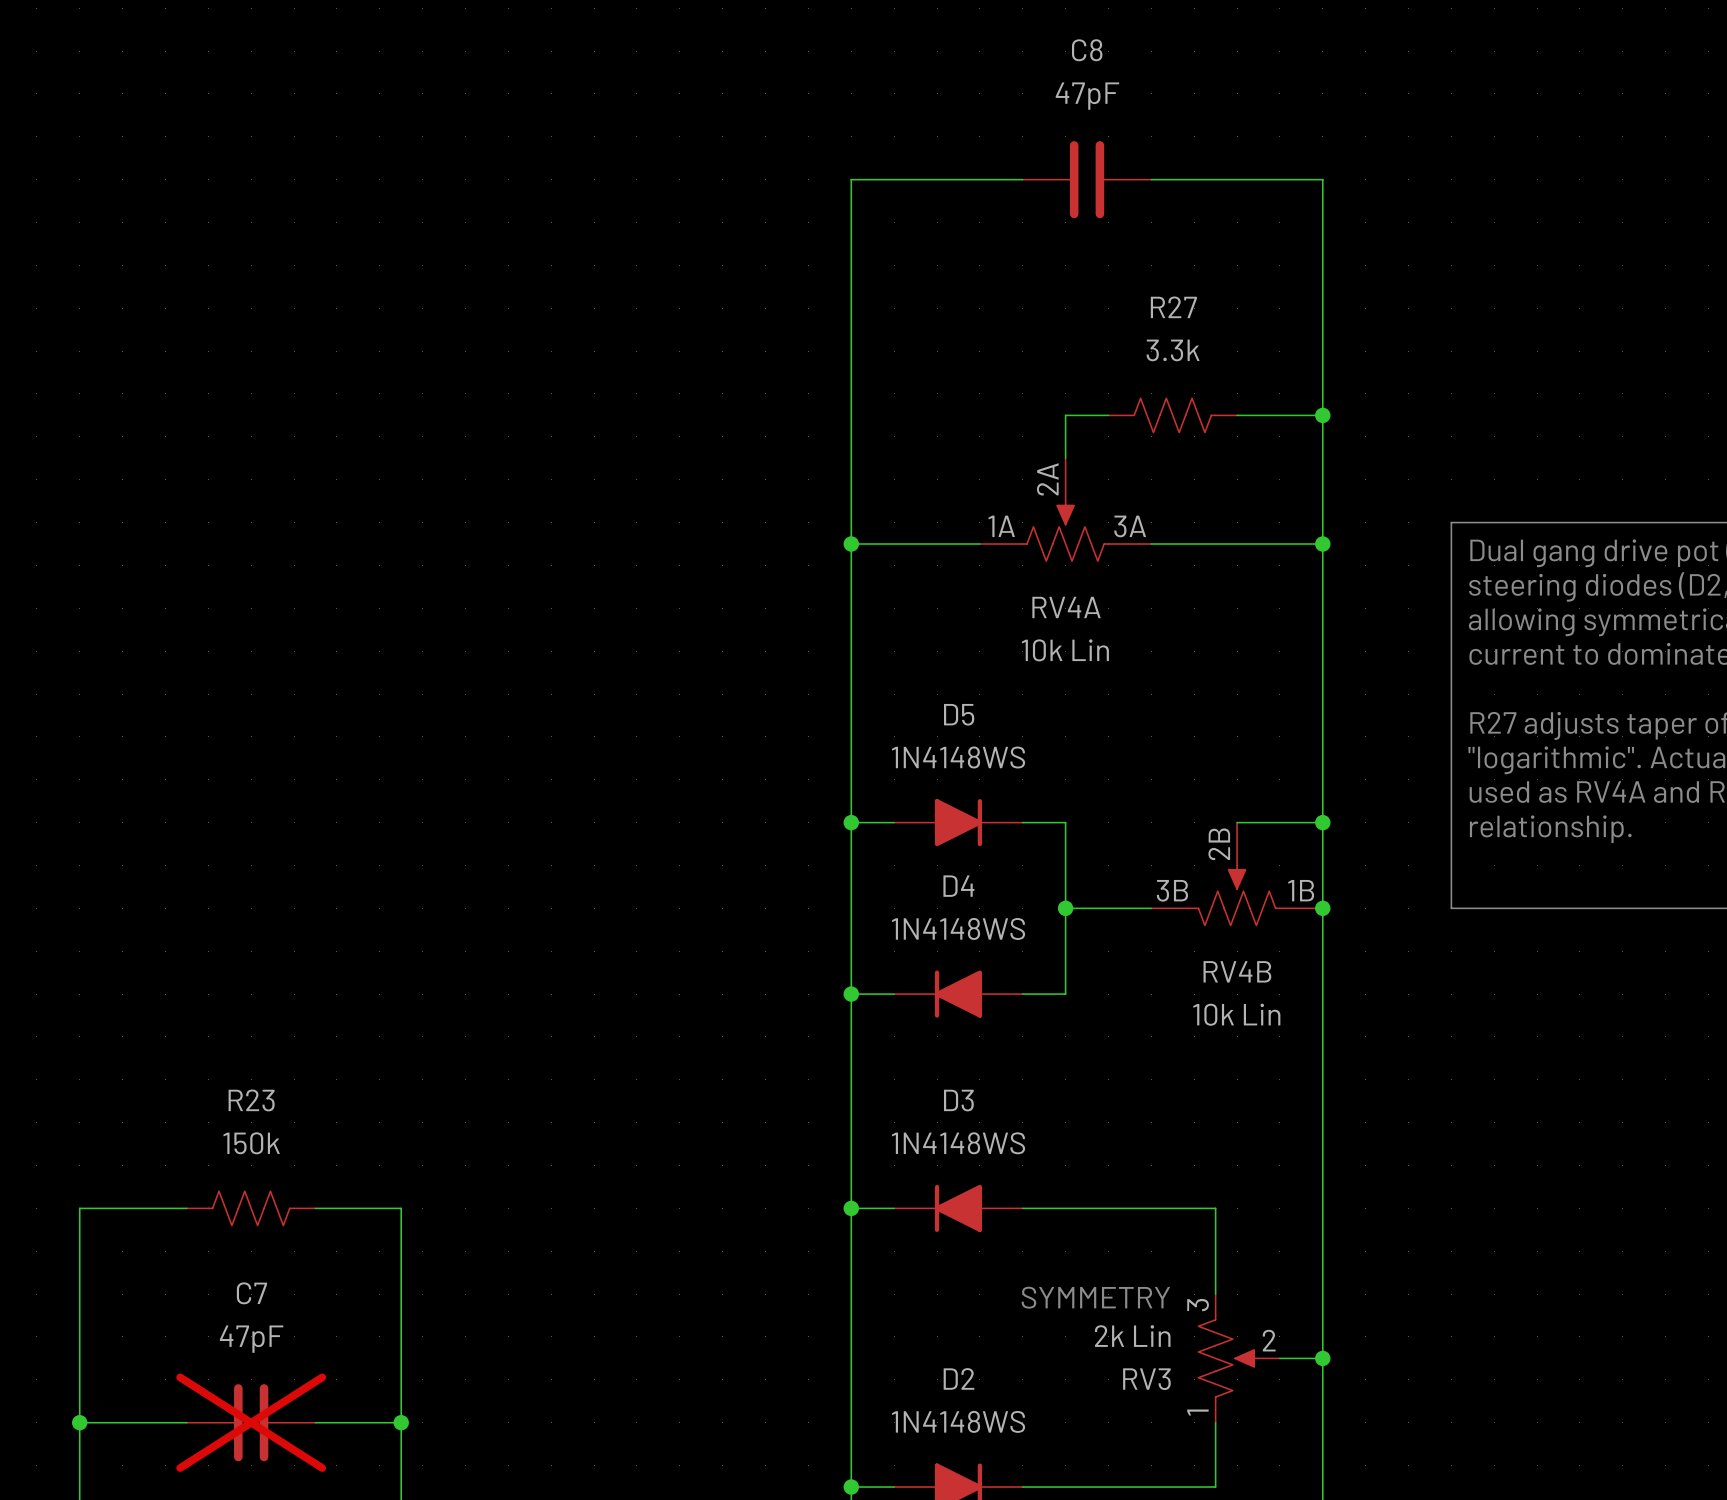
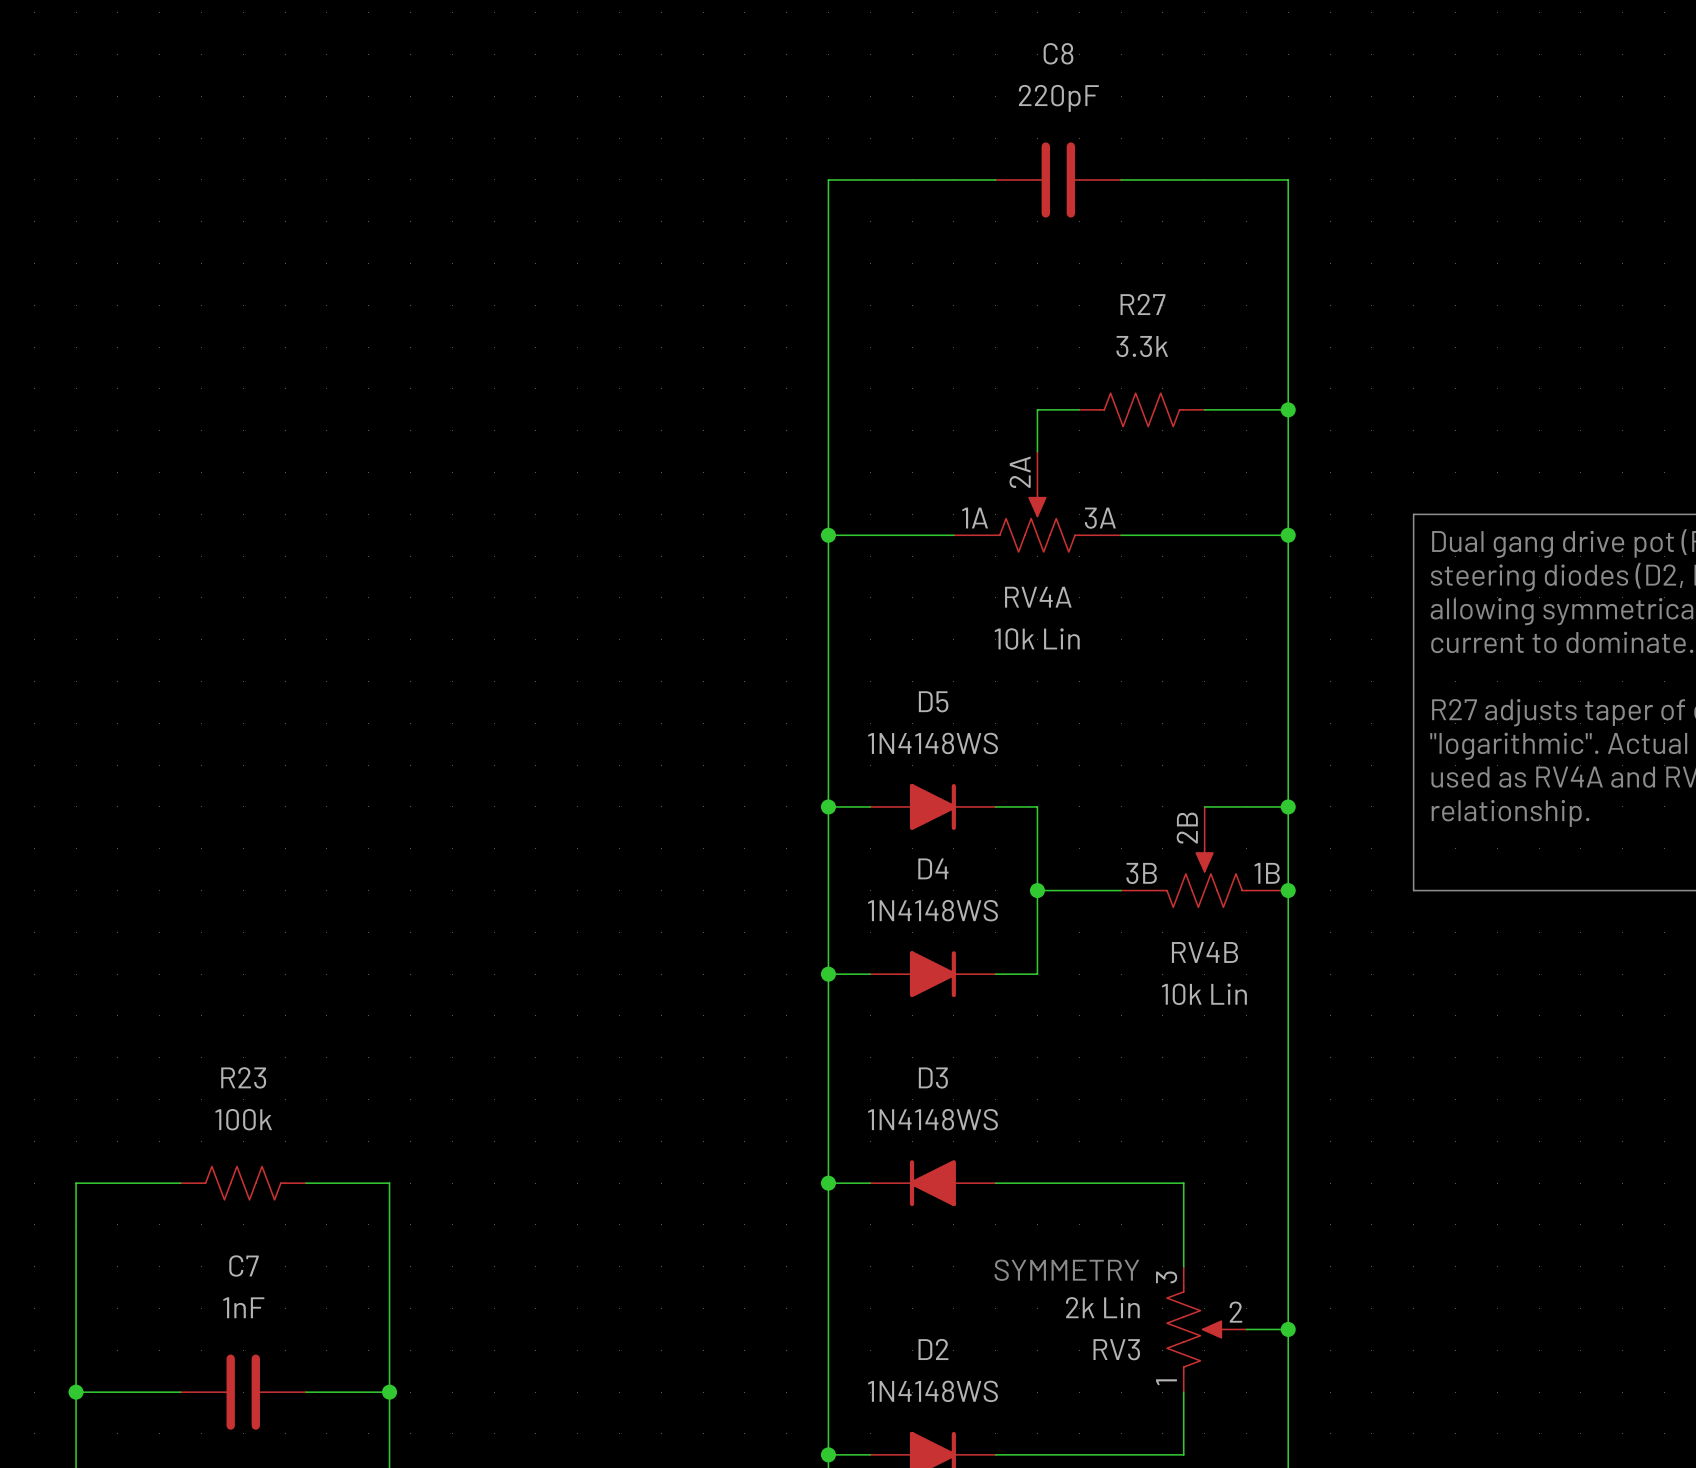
C8 value: 47pF (1087, 96) -> 220pF (1058, 98)
D4 rotation: 0° (958, 994) -> 180° (932, 974)
R23 value: 150k (251, 1143) -> 100k (243, 1119)
C7 value: 47pF (251, 1339) -> 1nF (243, 1307)
C7 do-not-place cross: (251, 1422) -> none

